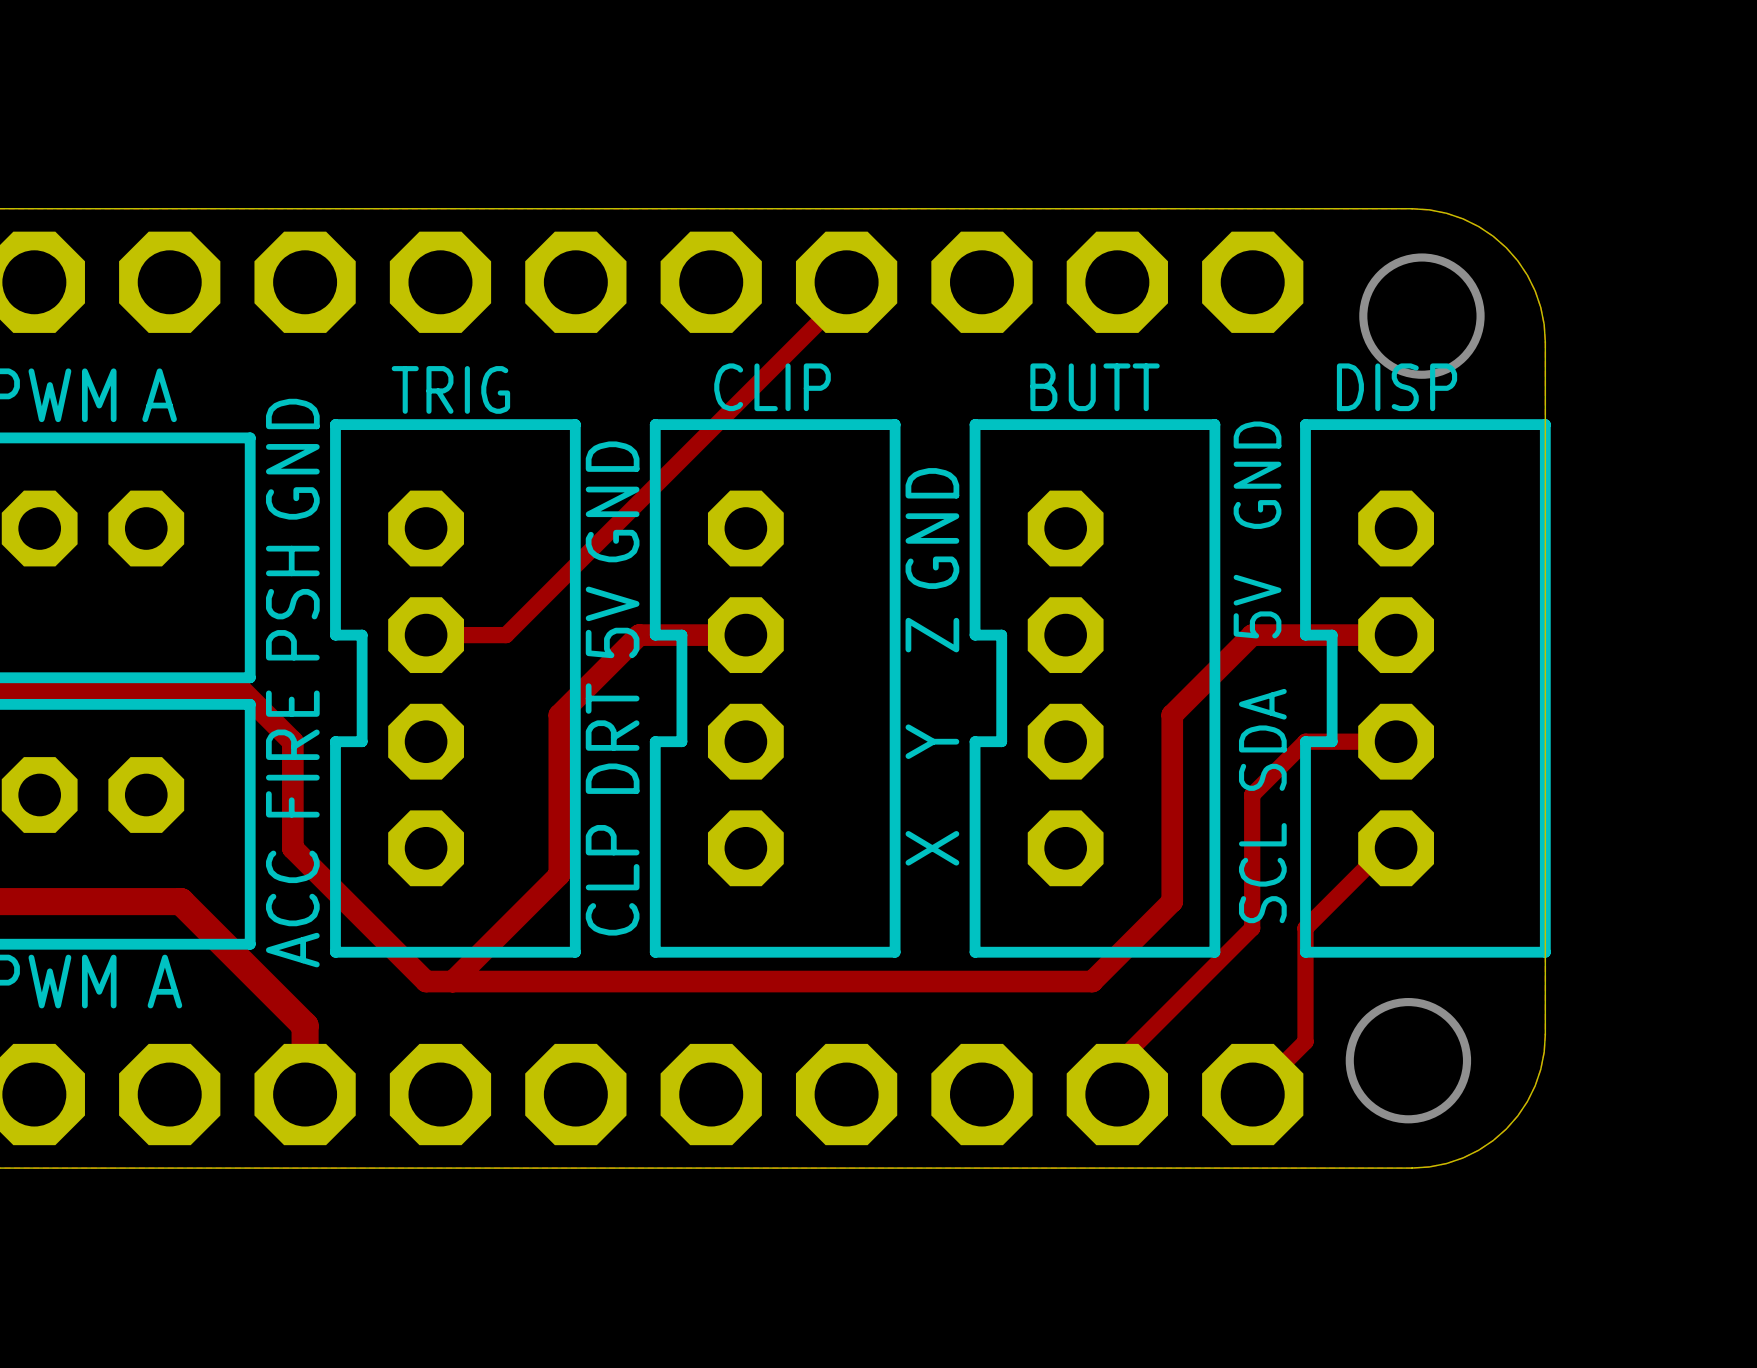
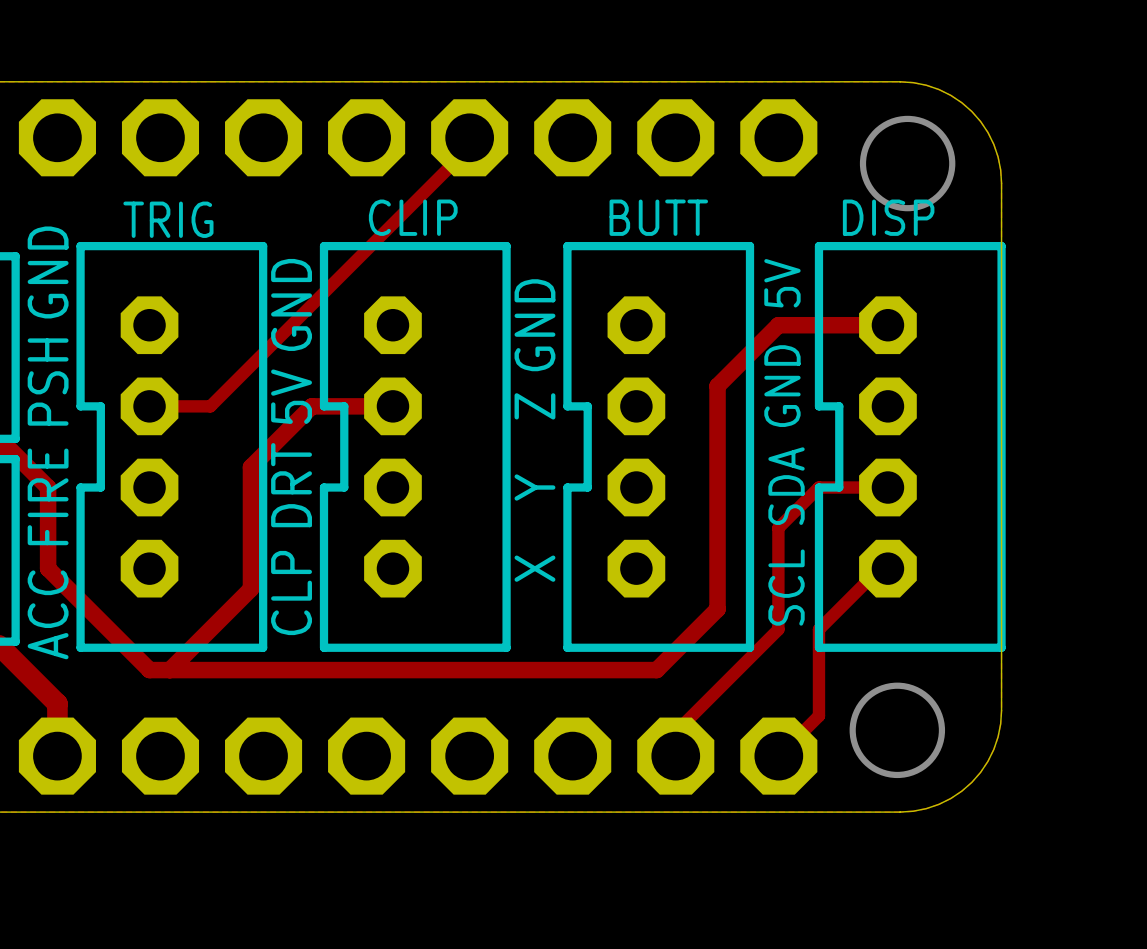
text: GND (1257, 475) -> 5V (782, 283)
text: 5V (1257, 606) -> GND (782, 386)
track: (1396, 635) (1252, 635) (1172, 715) -> (887, 325) (778, 325) (717, 386) (717, 467)

